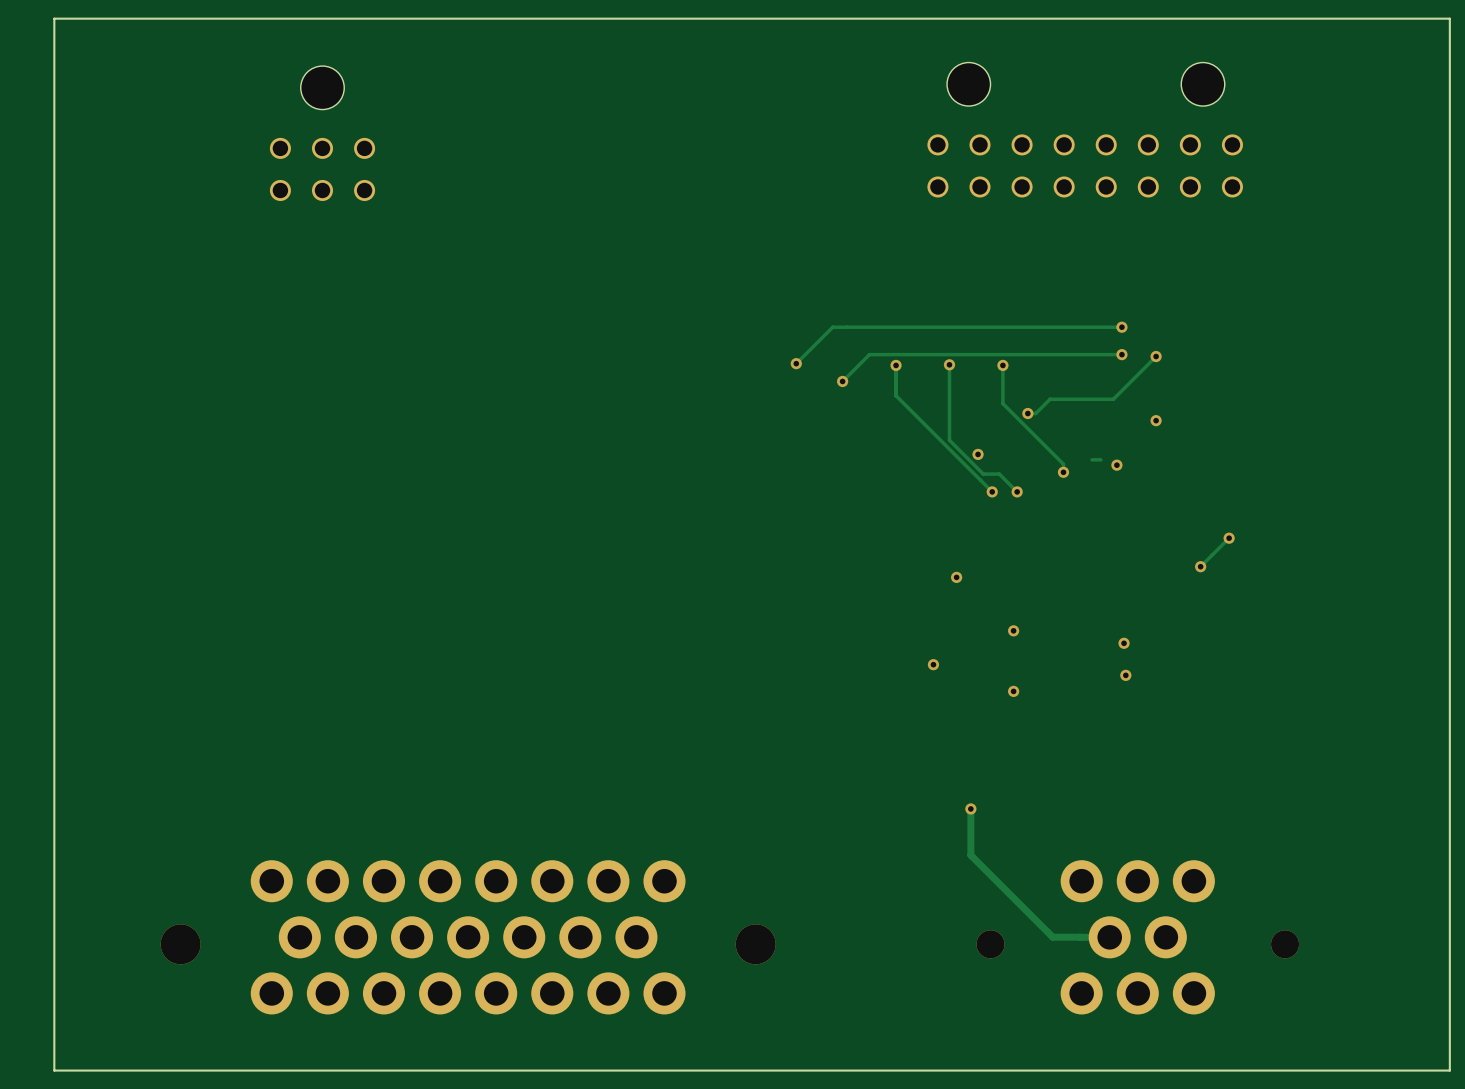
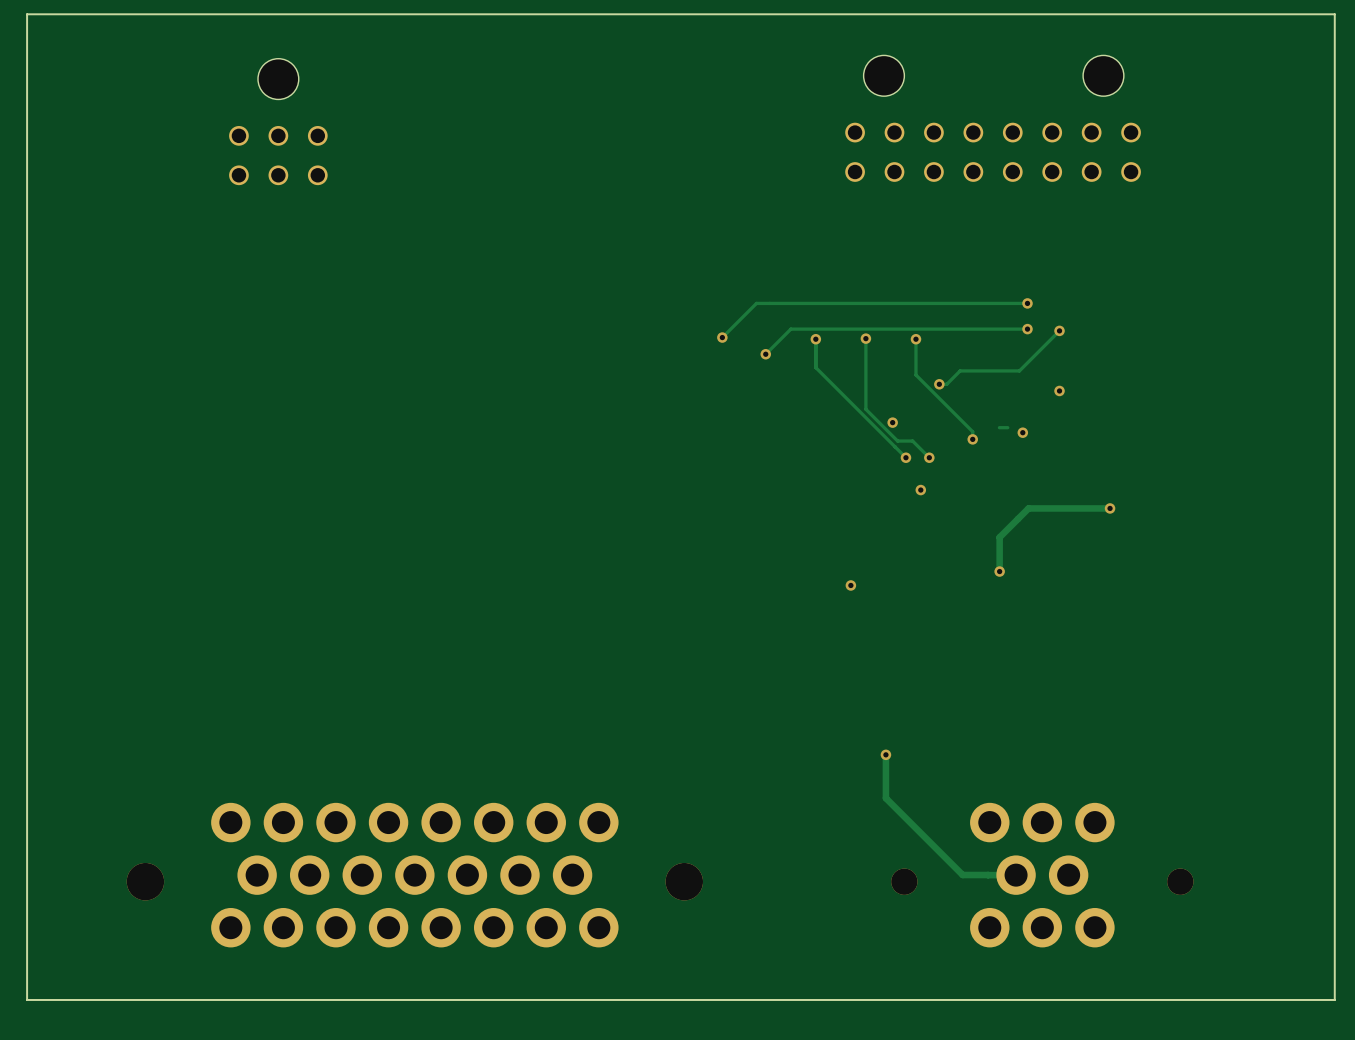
via: none -> (920, 490)
track: (1229, 538) (1200, 566) -> none
via: (1229, 538) -> none
track: none -> (1110, 508) (1028, 508) (999, 537) (999, 571)
via: none -> (1110, 508)
via: (1200, 566) -> none
via: (956, 577) -> none
via: none -> (999, 571)
via: none -> (850, 585)
via: (1013, 630) -> none
via: (1124, 643) -> none
via: (933, 664) -> none
via: (1125, 675) -> none
via: (1013, 691) -> none

